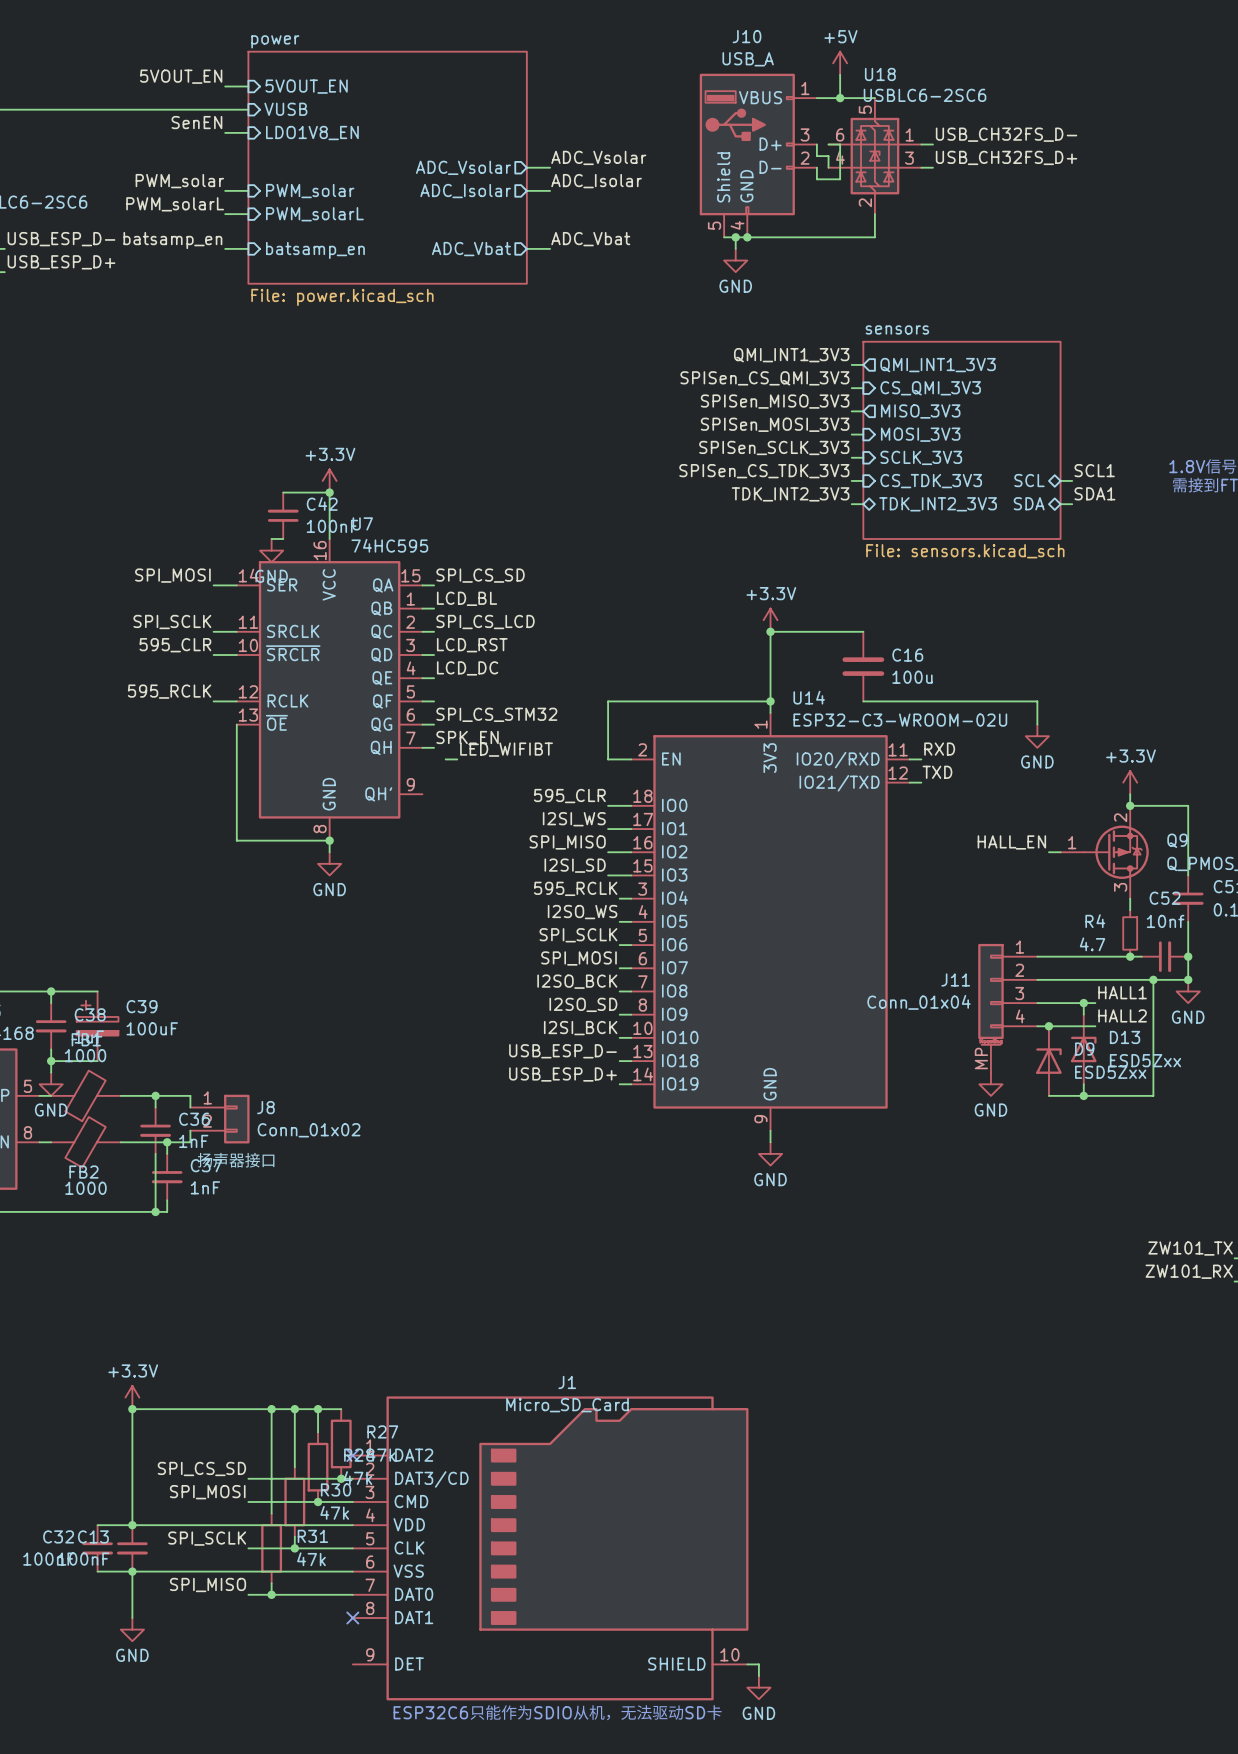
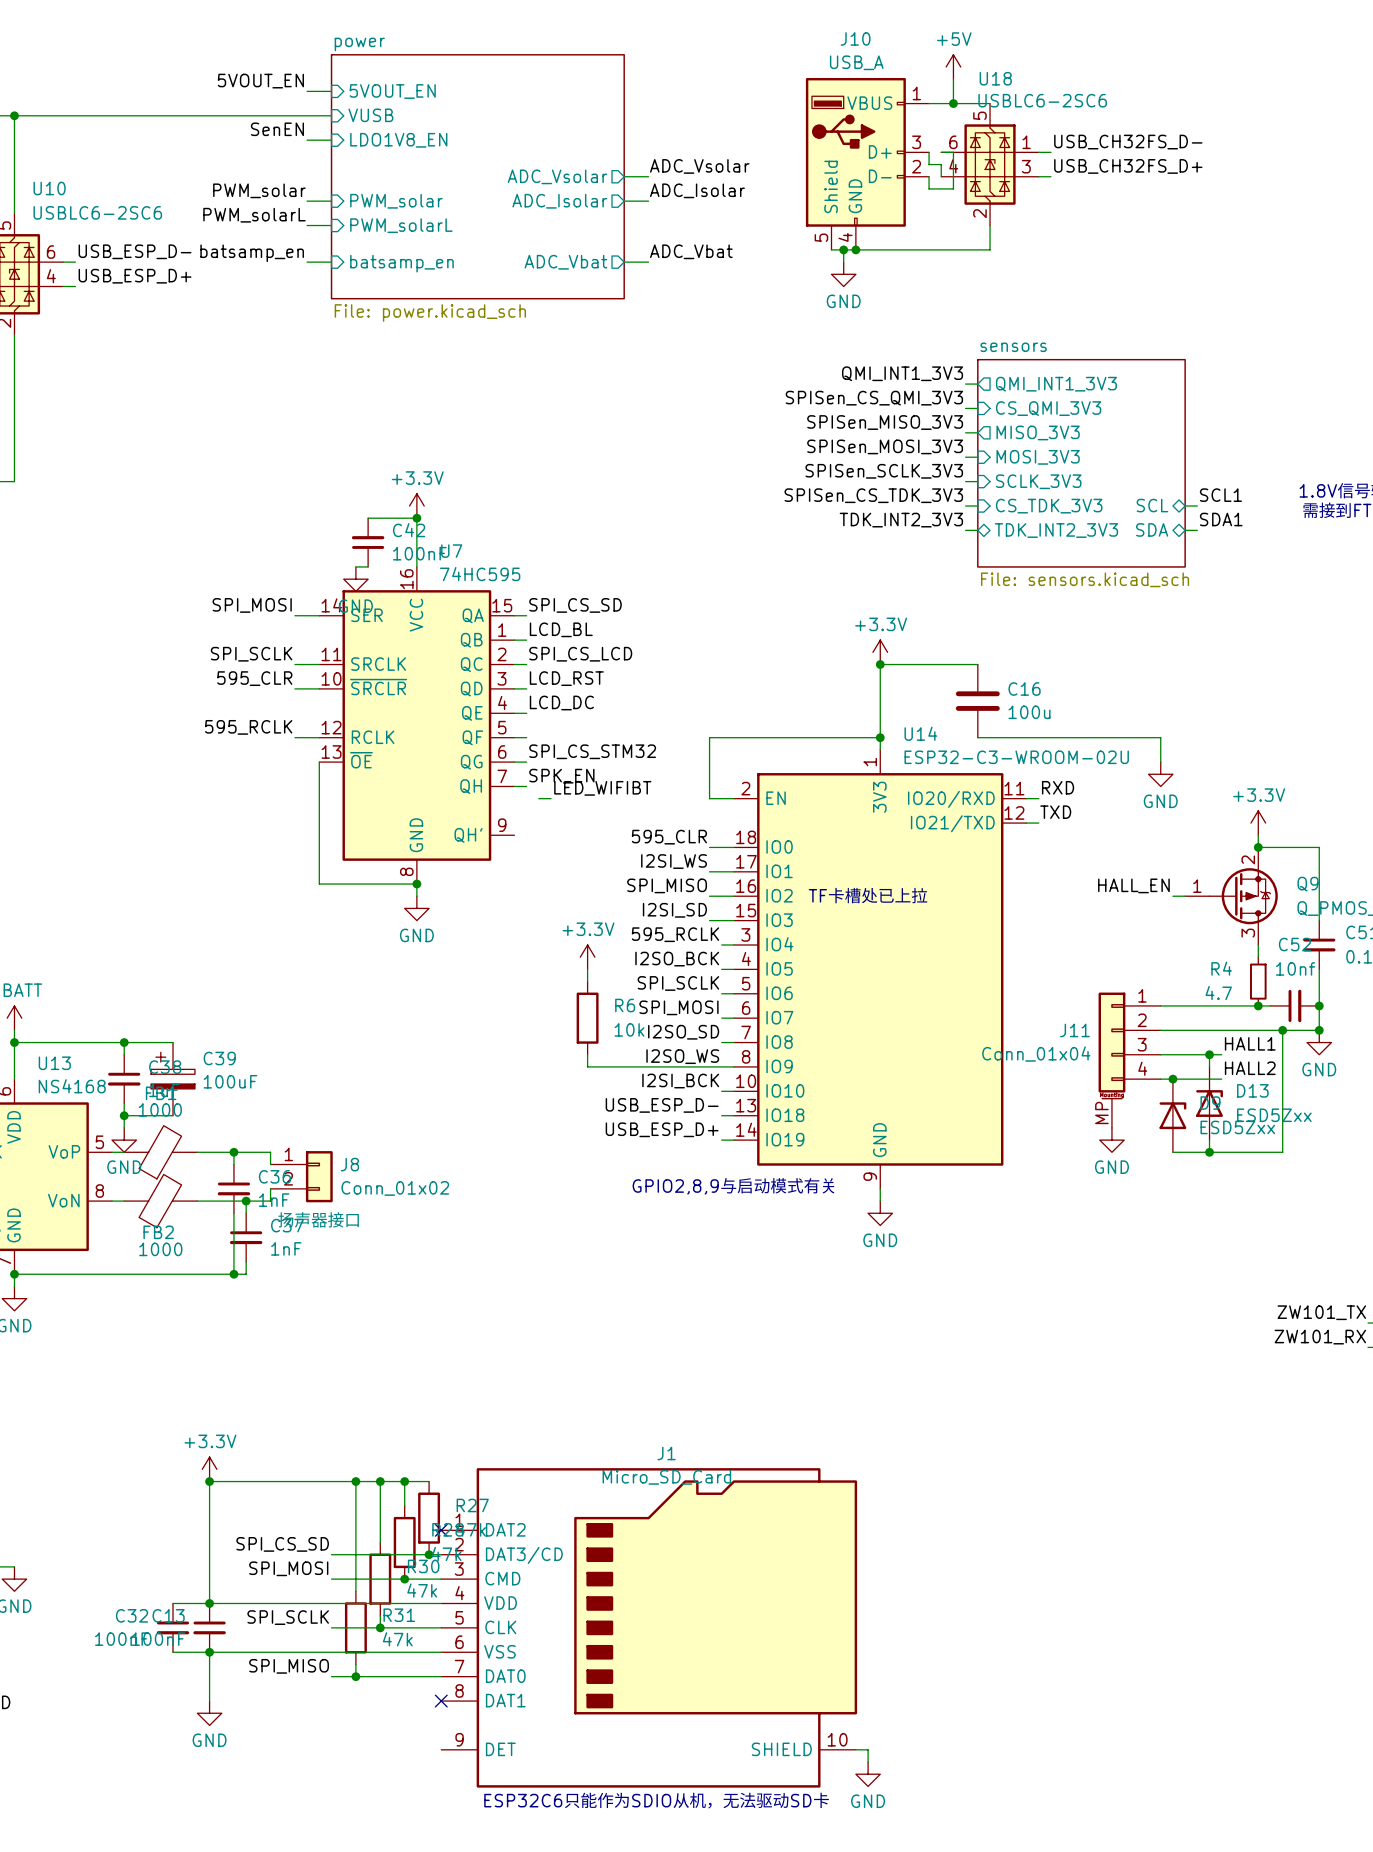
text: none -> TF卡槽处已上拉 (868, 895)
power symbol: none -> +3.3V (587, 957)
label: I2SO_WS (582, 912) -> I2SO_BCK (677, 959)
wire: none -> (587, 969) (587, 981)
R6: none -> 10k (587, 1018)
label: I2SO_BCK (577, 981) -> I2SO_SD (683, 1032)
wire: none -> (587, 1054) (587, 1066) (721, 1066)
label: I2SO_SD (583, 1004) -> I2SO_WS (682, 1056)
text: none -> GPIO2,8,9与启动模式有关 (733, 1185)

